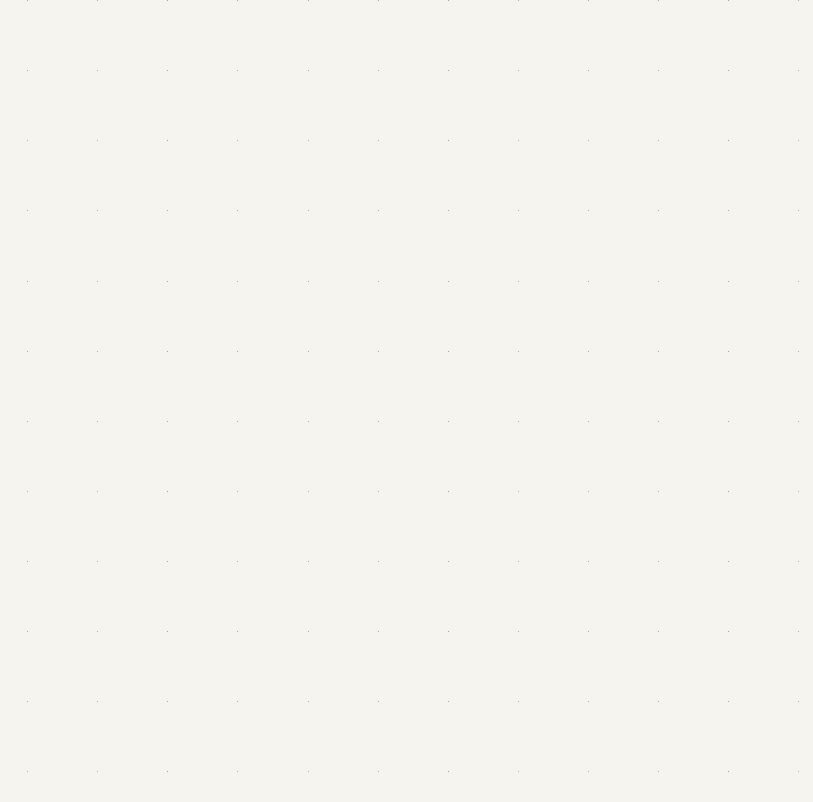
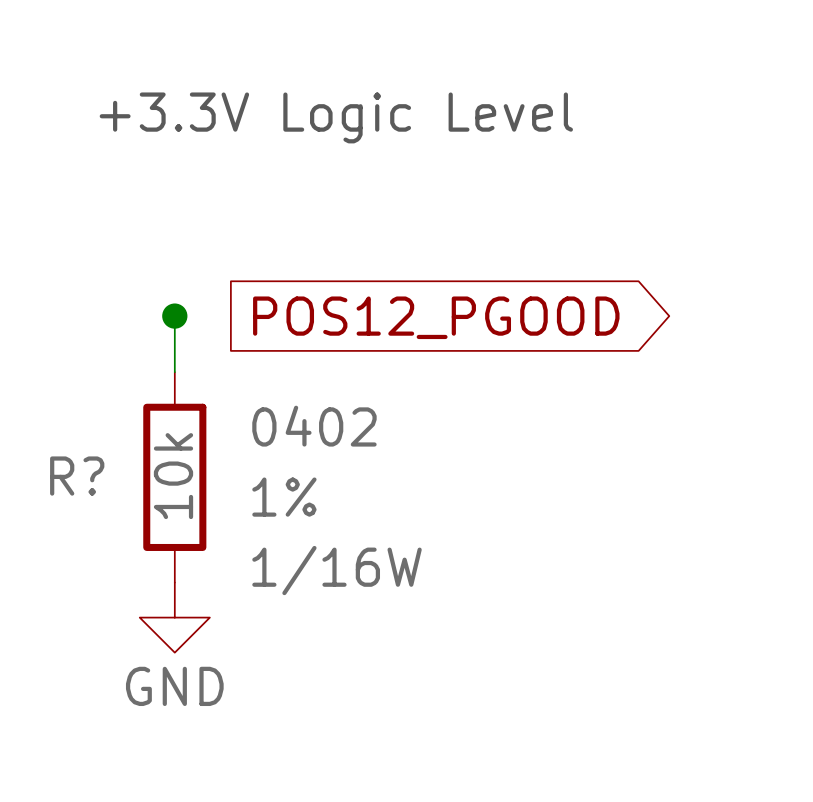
text: none -> +3.3V Logic Level (336, 117)
wire: none -> (174, 316) (174, 372)
junction: none -> (174, 316)
global label: none -> POS12_PGOOD (436, 317)
R?: none -> 10k (174, 477)
power symbol: none -> GND (174, 617)

